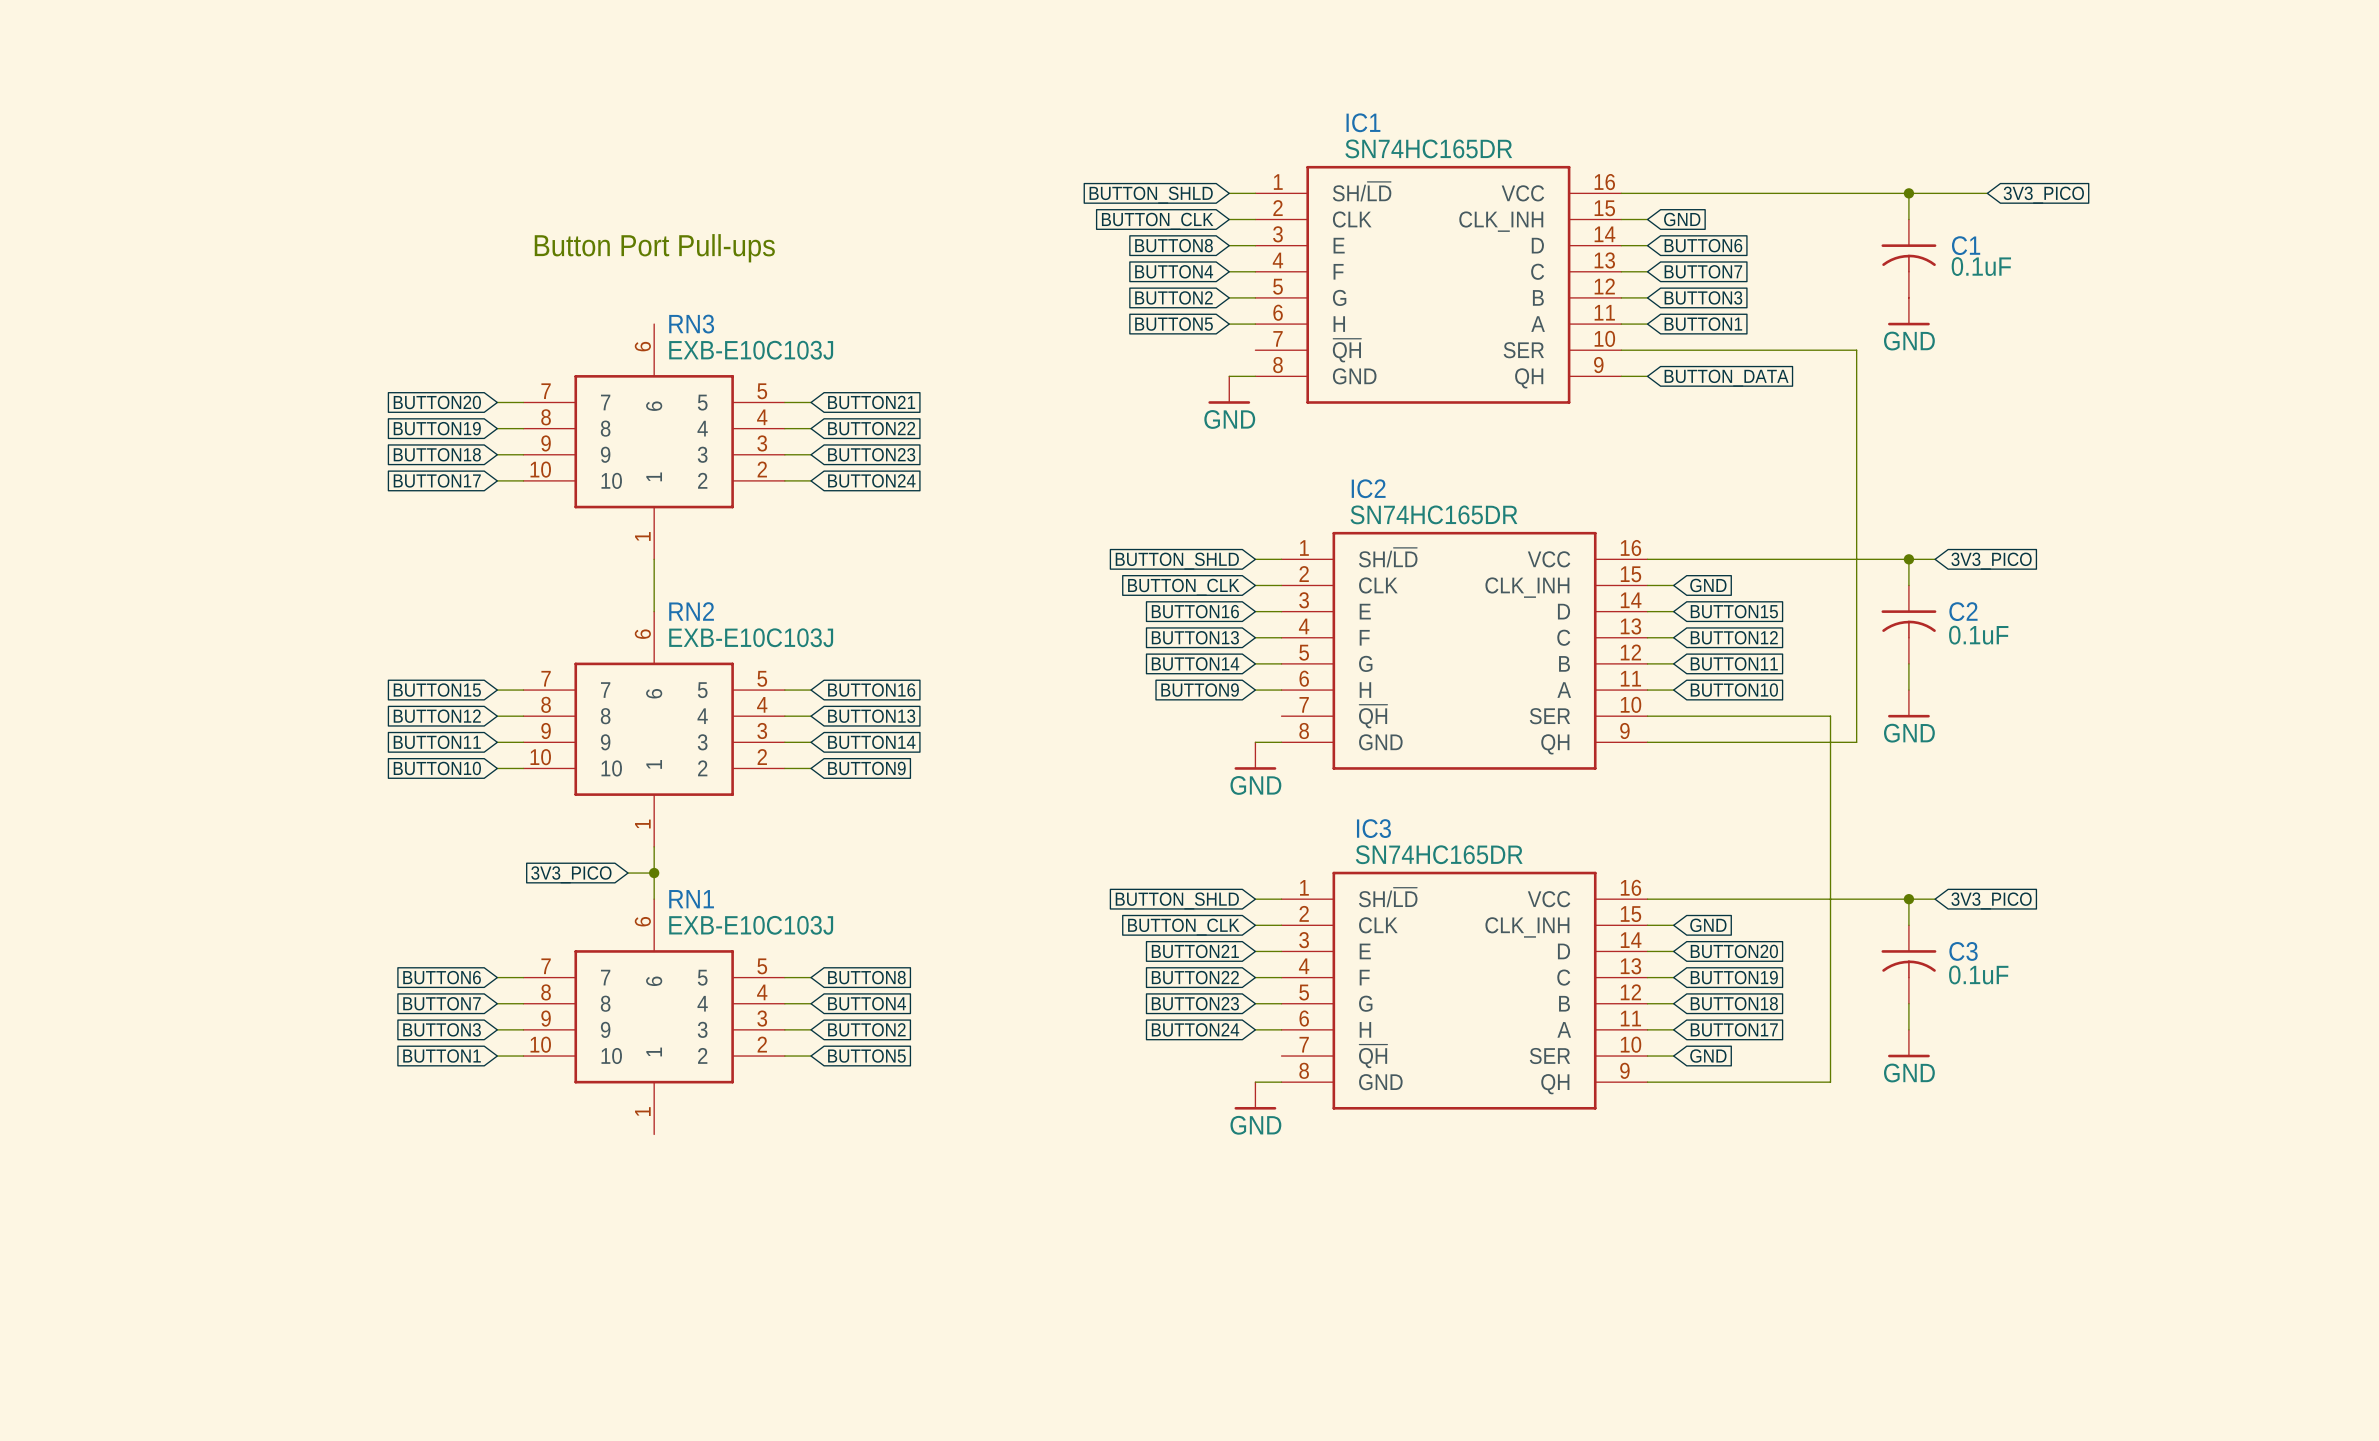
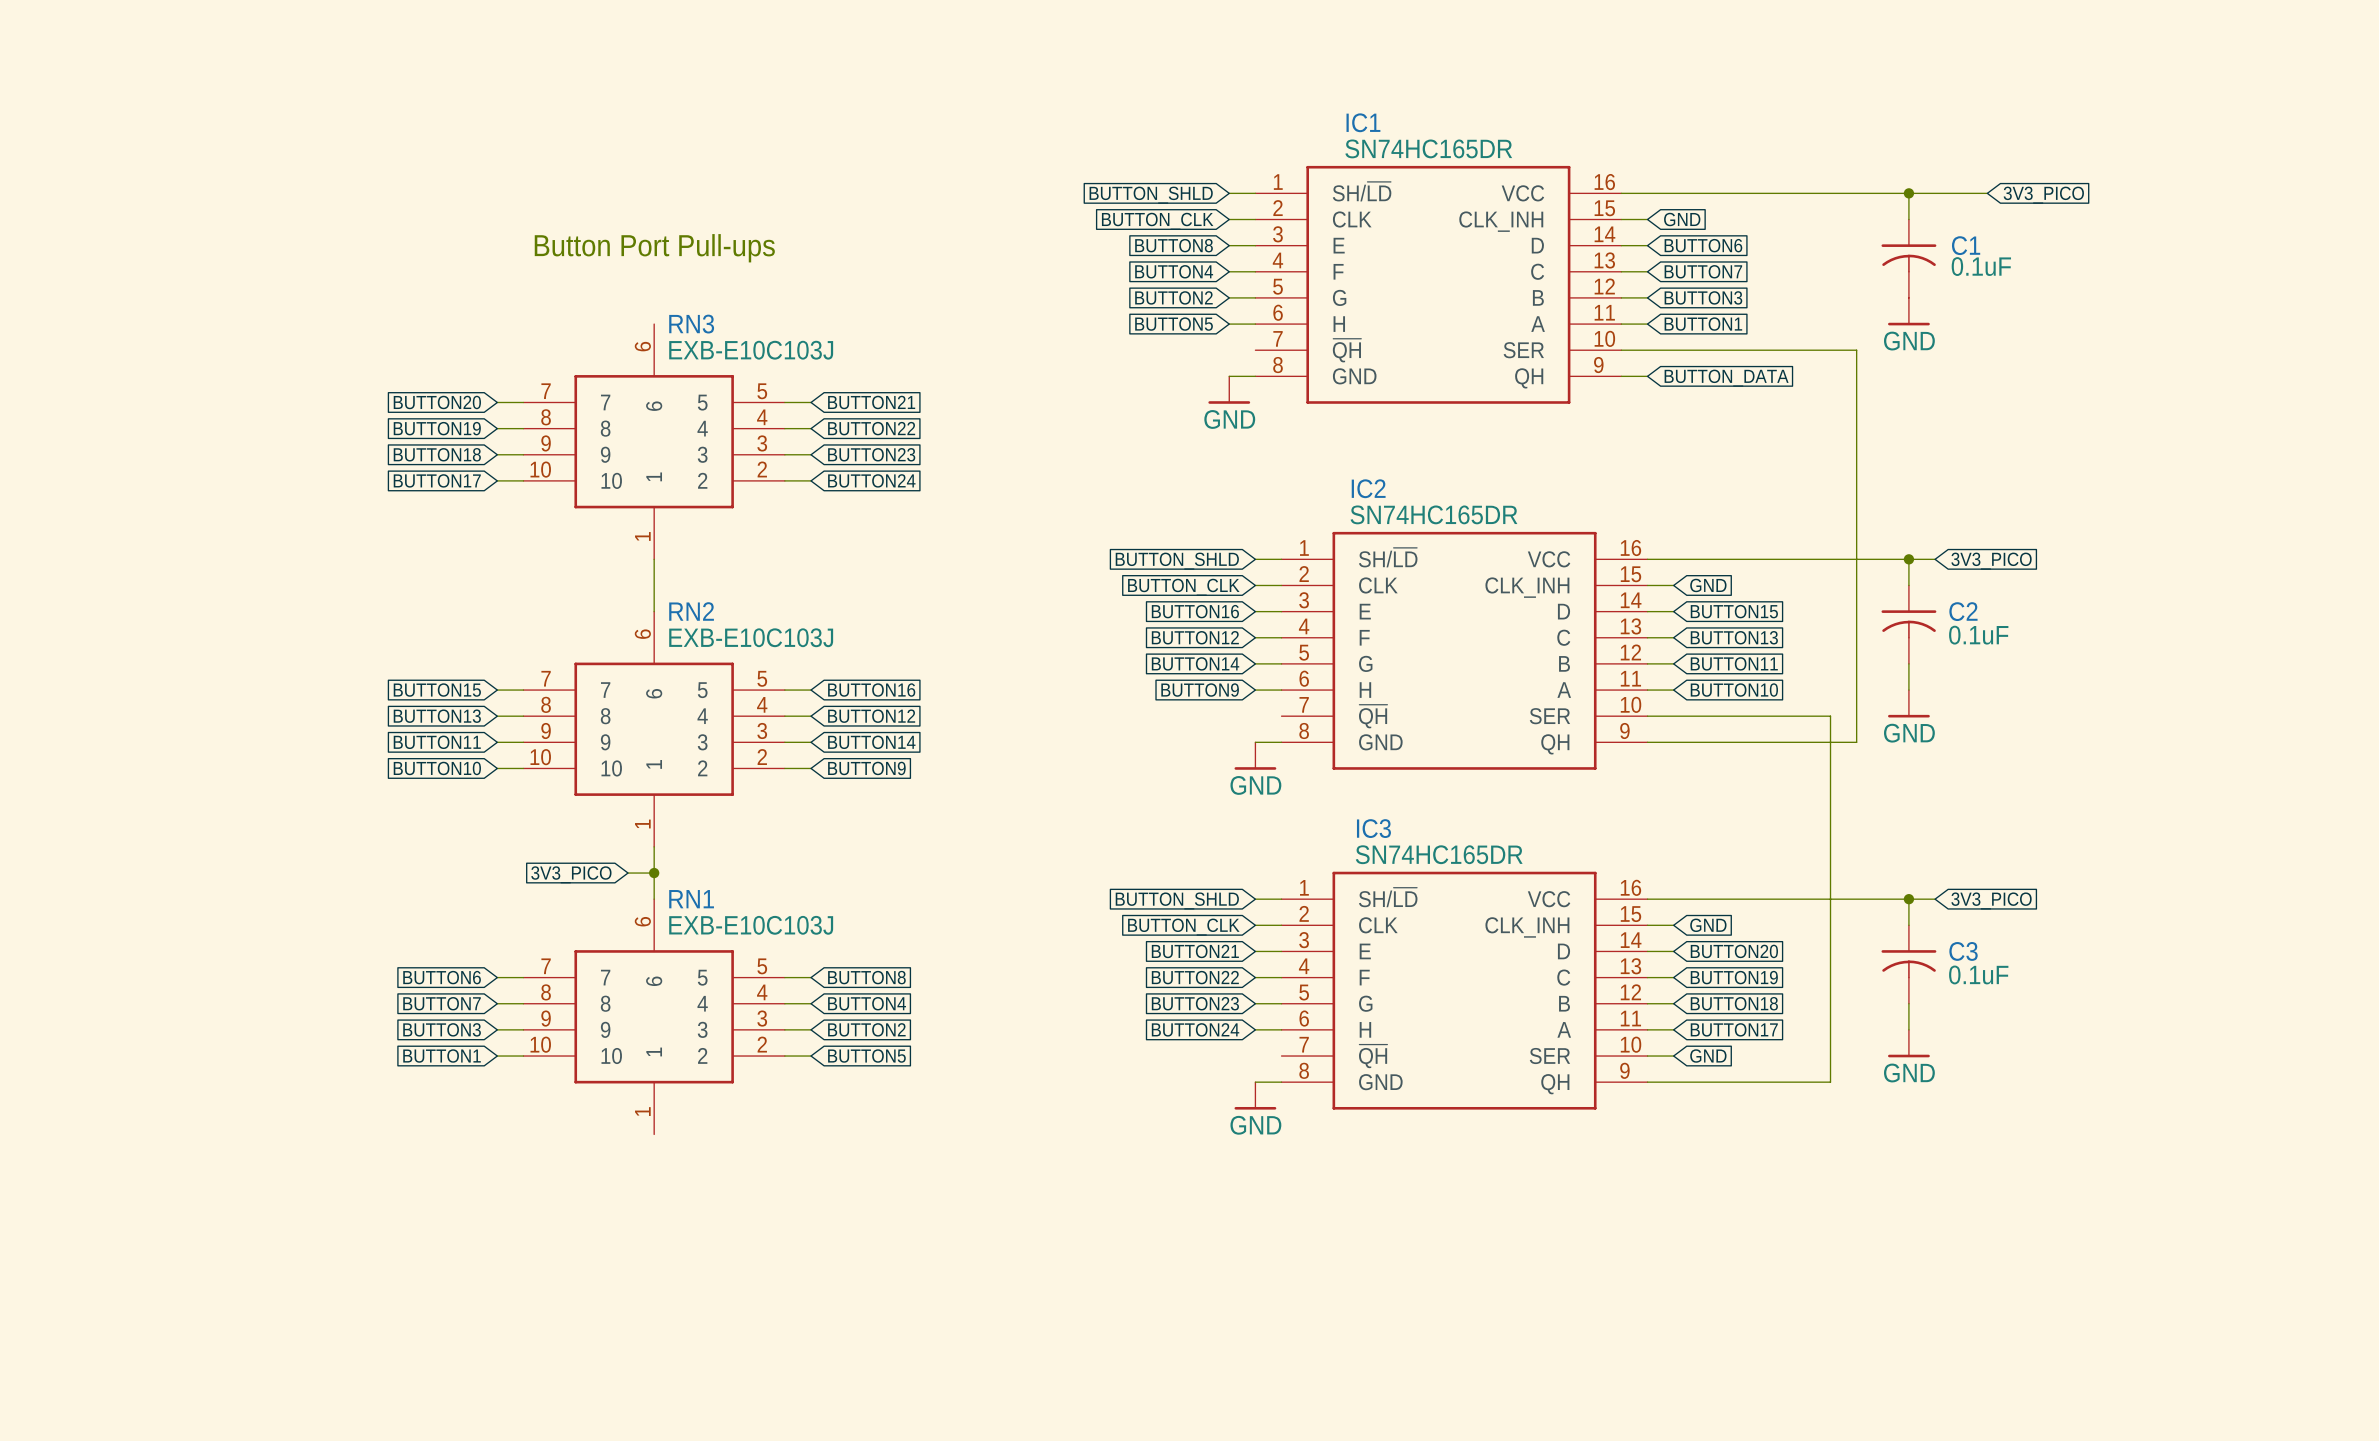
global label: BUTTON13 (1195, 637) -> BUTTON12 (1195, 637)
global label: BUTTON12 (1734, 637) -> BUTTON13 (1734, 637)
global label: BUTTON12 (437, 716) -> BUTTON13 (437, 716)
global label: BUTTON13 (871, 716) -> BUTTON12 (871, 716)

